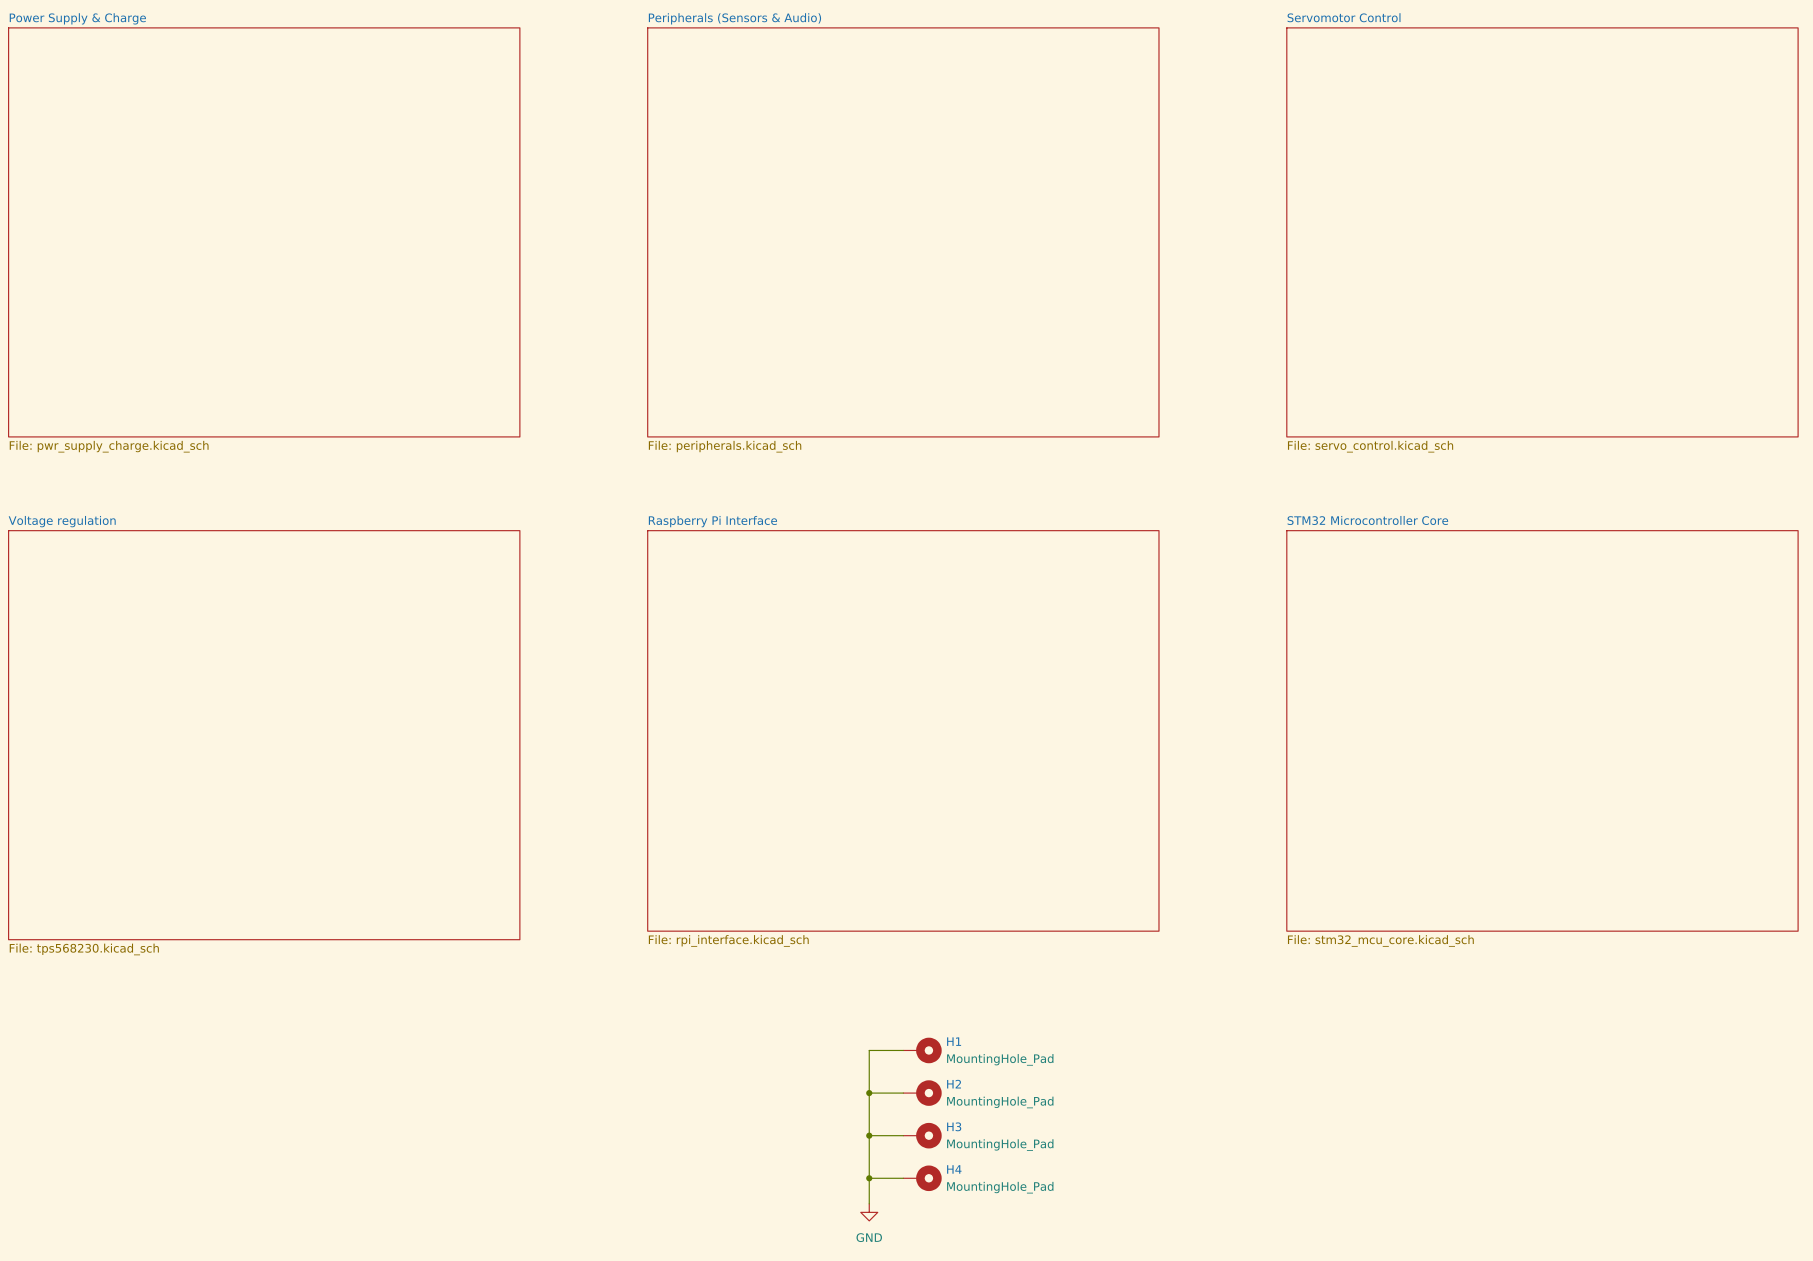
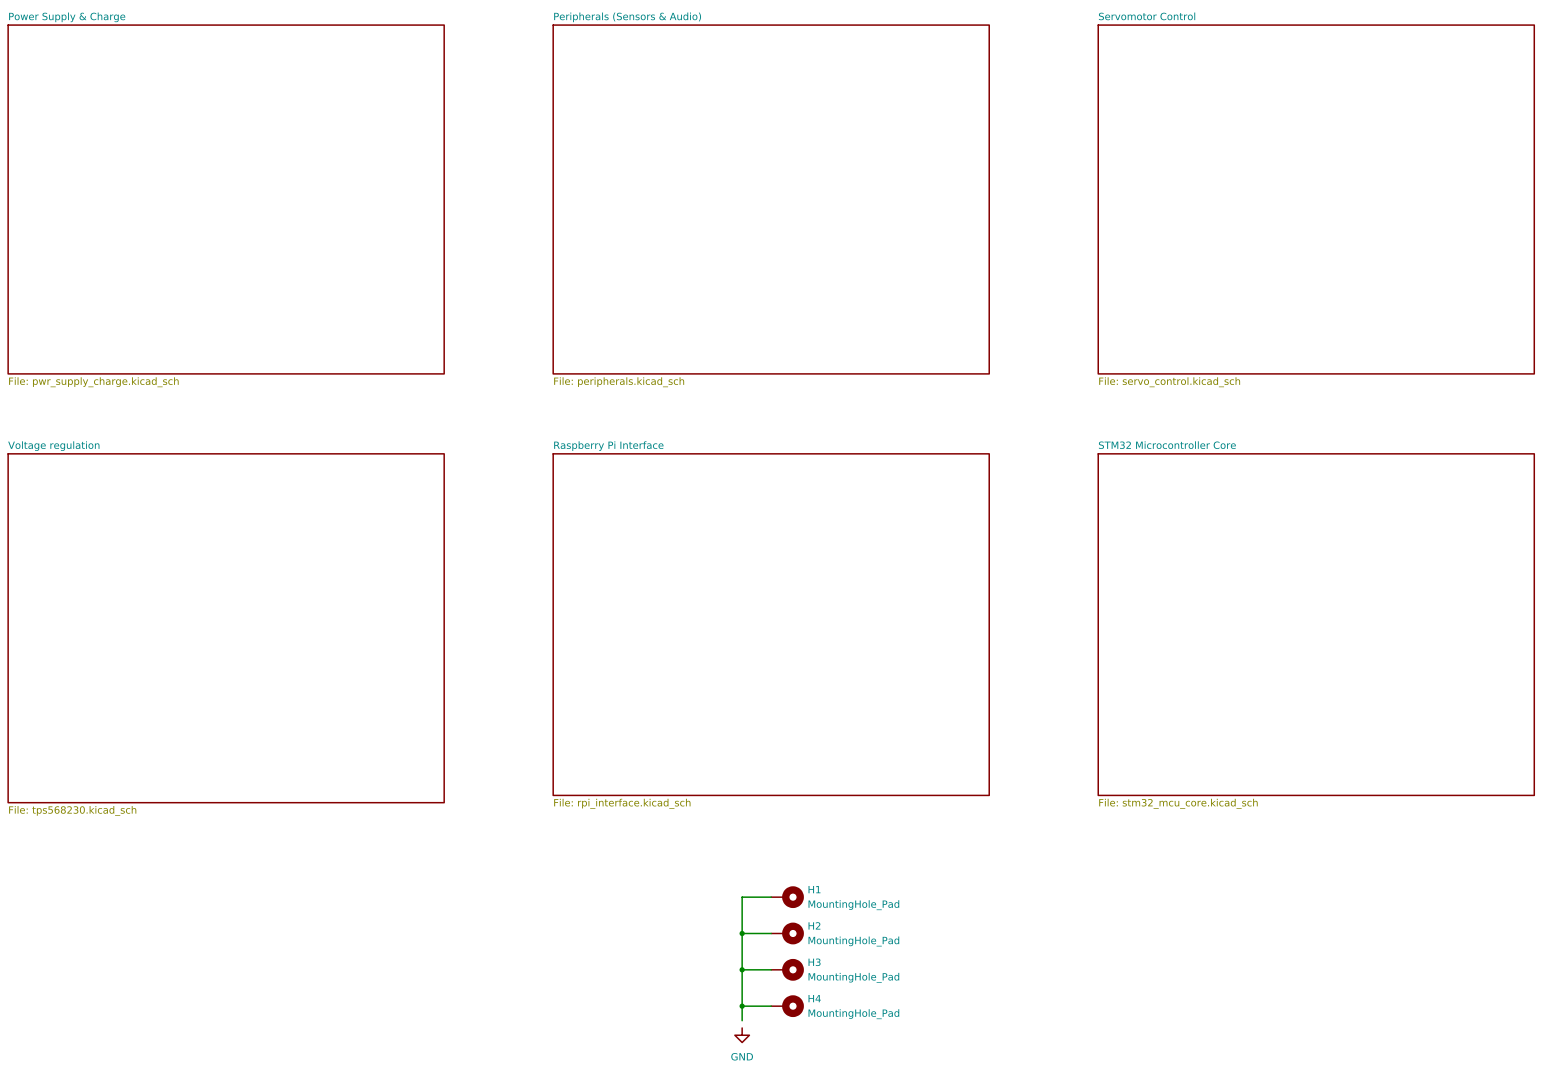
wire: (869, 1195) (869, 1203) -> none

